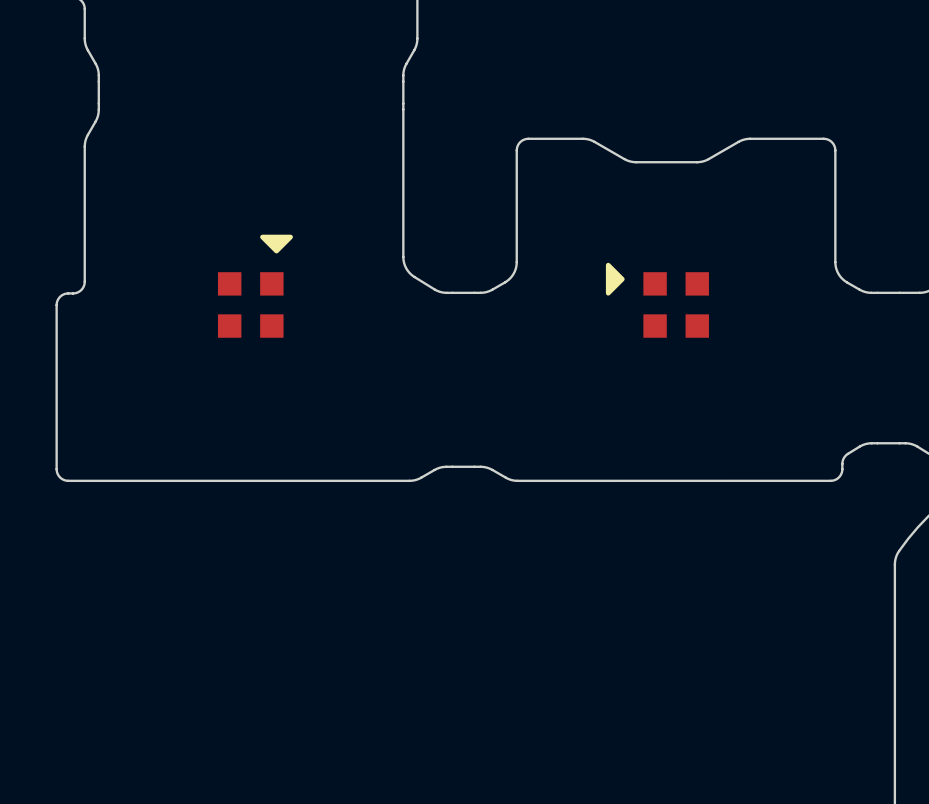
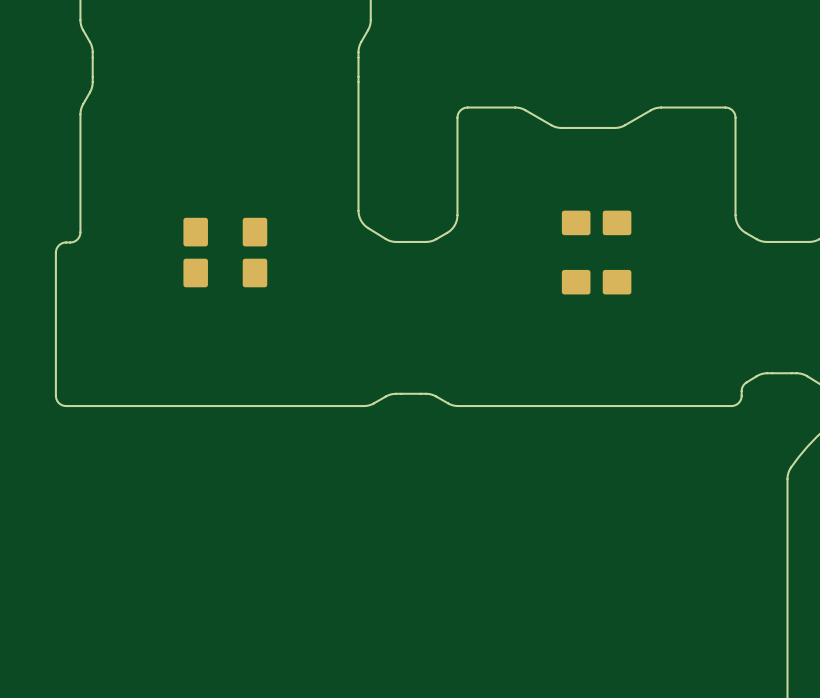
part footprint: [217, 234, 293, 338] -> [183, 217, 268, 288]
part footprint: [605, 262, 709, 338] -> [561, 210, 632, 295]

